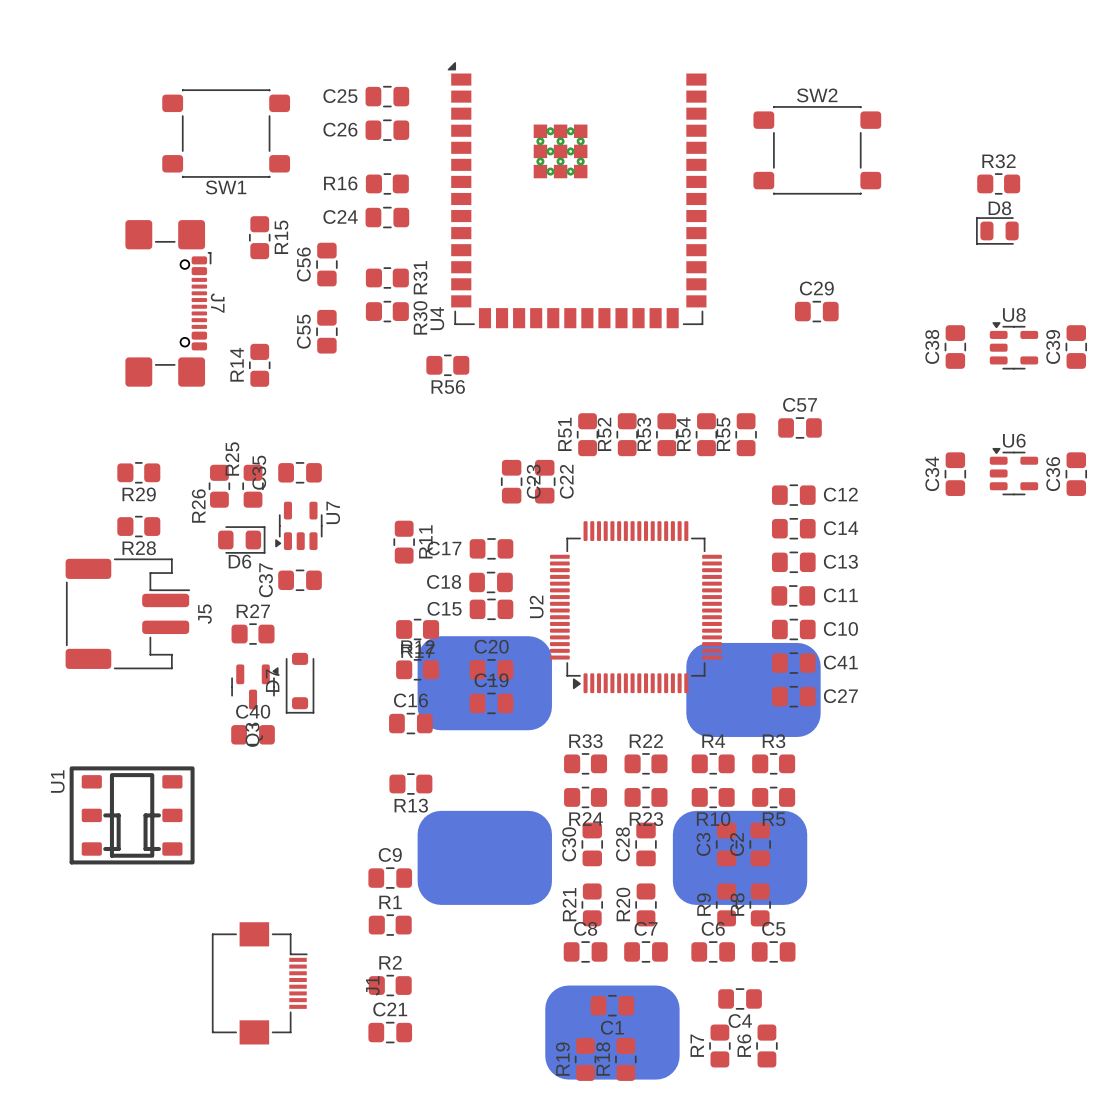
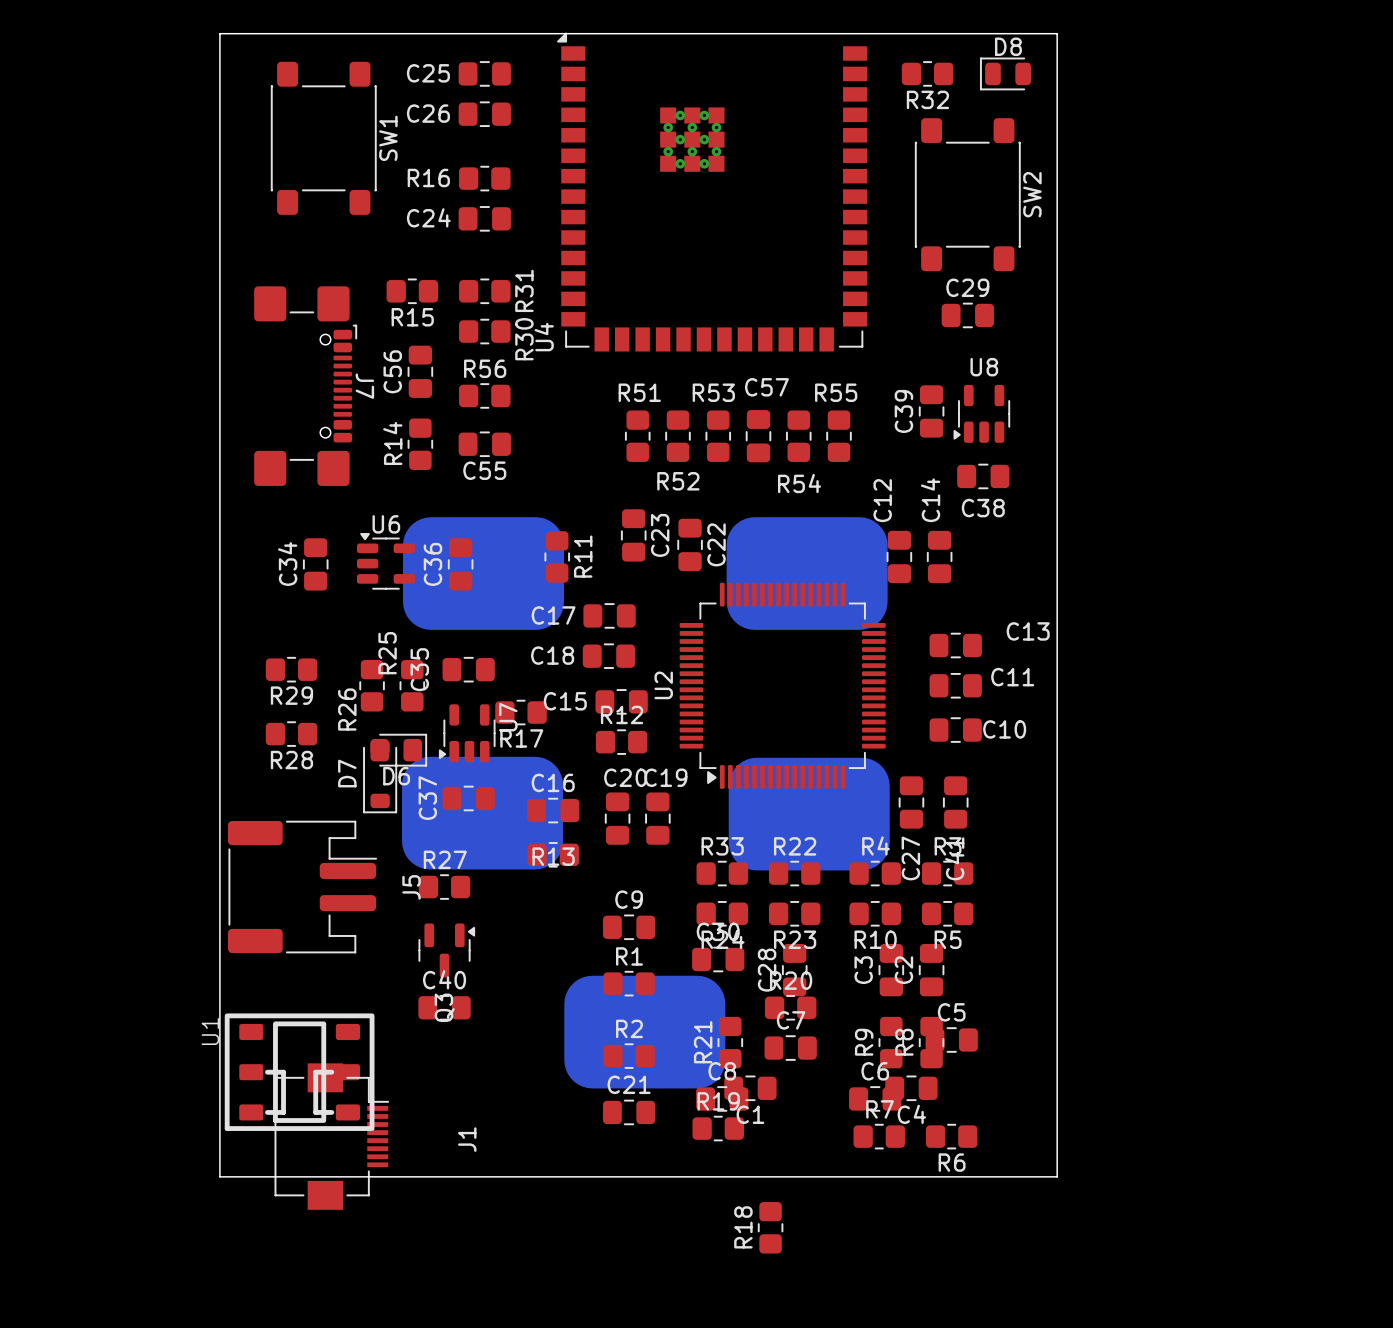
board edge: none -> (219, 33) (1057, 33) (1057, 1176) (219, 1176) (219, 33)
SW1 rotation: 0° (226, 133) -> 90° clockwise (323, 138)
SW2 rotation: 0° (817, 150) -> 90° clockwise (967, 194)
R32 name position: R32 (999, 161) -> R32 (927, 99)
R32 position: (998, 183) -> (927, 73)
SW1 name position: SW1 (226, 187) -> SW1 (388, 138)
D8 position: (997, 230) -> (1005, 73)
R15 rotation: 0° (259, 237) -> 90° clockwise (412, 291)
R15 position: (259, 237) -> (412, 291)
C56 position: (326, 264) -> (420, 371)
J7 position: (168, 303) -> (305, 386)
C29 position: (816, 311) -> (967, 315)
C55 name position: C55 (303, 331) -> C55 (484, 470)
C55 rotation: 0° (326, 331) -> 90° clockwise (484, 444)
C55 position: (326, 331) -> (484, 444)
U8 rotation: 0° (1013, 345) -> 90° counterclockwise (981, 413)
U8 position: (1013, 345) -> (981, 413)
C38 name position: C38 (932, 346) -> C38 (983, 508)
C38 rotation: 0° (955, 347) -> 90° clockwise (983, 476)
C38 position: (955, 347) -> (983, 476)
C39 position: (1076, 347) -> (931, 411)
R14 position: (259, 365) -> (420, 444)
R56 position: (447, 365) -> (484, 395)
R56 name position: R56 (448, 386) -> R56 (485, 368)
C57 rotation: 0° (800, 427) -> 90° clockwise (758, 436)
C57 position: (800, 427) -> (758, 436)
R51 name rotation: 0° (564, 434) -> 90° clockwise (639, 392)
R51 position: (587, 434) -> (637, 436)
R52 name rotation: 0° (604, 434) -> 90° clockwise (678, 481)
R52 position: (627, 434) -> (677, 436)
R53 name rotation: 0° (644, 434) -> 90° clockwise (713, 392)
R53 position: (666, 434) -> (718, 436)
R54 name rotation: 0° (683, 434) -> 90° clockwise (799, 483)
R54 position: (706, 434) -> (798, 436)
R55 name rotation: 0° (723, 434) -> 90° clockwise (836, 392)
R55 position: (746, 434) -> (839, 436)
U6 position: (1013, 471) -> (385, 561)
R29 position: (138, 472) -> (291, 669)
C35 position: (300, 472) -> (468, 669)
C34 position: (955, 474) -> (315, 564)
C36 position: (1076, 474) -> (460, 564)
C22 position: (544, 481) -> (690, 544)
R26 position: (219, 486) -> (372, 685)
R25 position: (253, 486) -> (412, 685)
C12 name position: C12 (840, 494) -> C12 (882, 500)
C12 rotation: 0° (793, 495) -> 90° clockwise (899, 556)
C12 position: (793, 495) -> (899, 556)
part: none -> (483, 573)
part: none -> (807, 573)
U7 position: (298, 525) -> (467, 733)
R28 position: (138, 526) -> (291, 734)
C14 rotation: 0° (793, 528) -> 90° clockwise (939, 556)
C14 position: (793, 528) -> (939, 556)
C14 name position: C14 (841, 528) -> C14 (930, 500)
D6 position: (241, 539) -> (398, 750)
R11 position: (404, 542) -> (557, 556)
C13 position: (793, 562) -> (955, 645)
C37 position: (300, 580) -> (468, 798)
C11 position: (793, 595) -> (955, 685)
C11 name position: C11 (840, 595) -> C11 (1012, 677)
C15 position: (491, 609) -> (621, 701)
J5 position: (127, 613) -> (302, 887)
J5 name position: J5 (204, 614) -> J5 (411, 887)
C10 name position: C10 (840, 628) -> C10 (1004, 729)
C10 position: (793, 629) -> (955, 730)
R27 position: (253, 634) -> (444, 887)
C41 rotation: 0° (793, 663) -> 90° clockwise (955, 802)
C41 position: (793, 663) -> (955, 802)
R12 position: (417, 669) -> (621, 742)
C20 rotation: 0° (491, 669) -> 90° clockwise (617, 818)
C20 position: (491, 669) -> (617, 818)
part: (484, 683) -> none
Q3 position: (254, 686) -> (446, 950)
part: (753, 689) -> none
C27 rotation: 0° (793, 696) -> 90° clockwise (911, 802)
C27 position: (793, 696) -> (911, 802)
C19 rotation: 0° (491, 703) -> 90° clockwise (657, 818)
C19 position: (491, 703) -> (657, 818)
part: none -> (482, 813)
part: none -> (809, 814)
C16 position: (410, 723) -> (553, 810)
C40 position: (253, 734) -> (444, 1007)
R13 position: (410, 784) -> (553, 854)
R13 name position: R13 (411, 805) -> R13 (553, 856)
U1 position: (132, 815) -> (299, 1072)
C30 rotation: 0° (592, 844) -> 90° clockwise (718, 959)
part position: (484, 857) -> (644, 1032)
part: (740, 857) -> none
C9 position: (390, 878) -> (629, 927)
R20 rotation: 0° (646, 904) -> 90° clockwise (790, 1007)
R20 position: (646, 904) -> (790, 1007)
R1 position: (390, 925) -> (629, 983)
C7 position: (646, 951) -> (790, 1048)
C5 position: (773, 951) -> (951, 1039)
R2 position: (390, 985) -> (629, 1056)
C4 position: (740, 998) -> (911, 1088)
C1 position: (612, 1005) -> (750, 1088)
C21 position: (390, 1032) -> (629, 1112)
part: (612, 1032) -> none
R7 rotation: 0° (719, 1045) -> 90° clockwise (879, 1136)
R7 position: (719, 1045) -> (879, 1136)
R6 name position: R6 (744, 1045) -> R6 (952, 1162)
R6 rotation: 0° (766, 1045) -> 90° clockwise (951, 1136)
R6 position: (766, 1045) -> (951, 1136)
R19 rotation: 0° (585, 1059) -> 90° clockwise (718, 1128)
R19 position: (585, 1059) -> (718, 1128)

